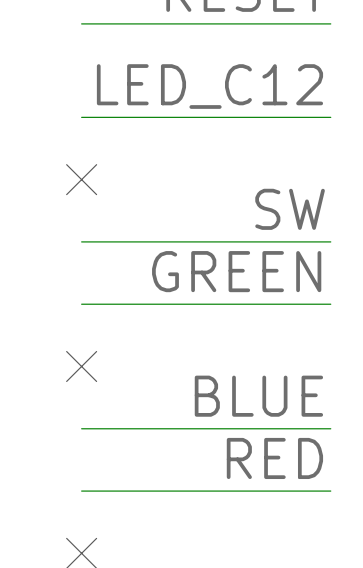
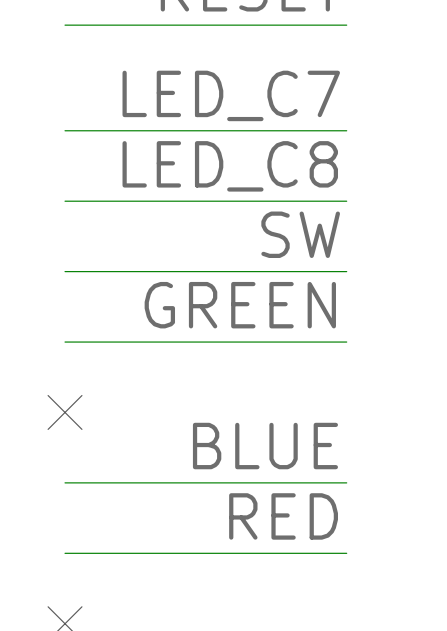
label: LED_C12 (209, 86) -> LED_C7 (231, 95)
label: none -> LED_C8 (230, 166)
wire: none -> (65, 201) (346, 201)
no-connect mark: (81, 179) -> none

